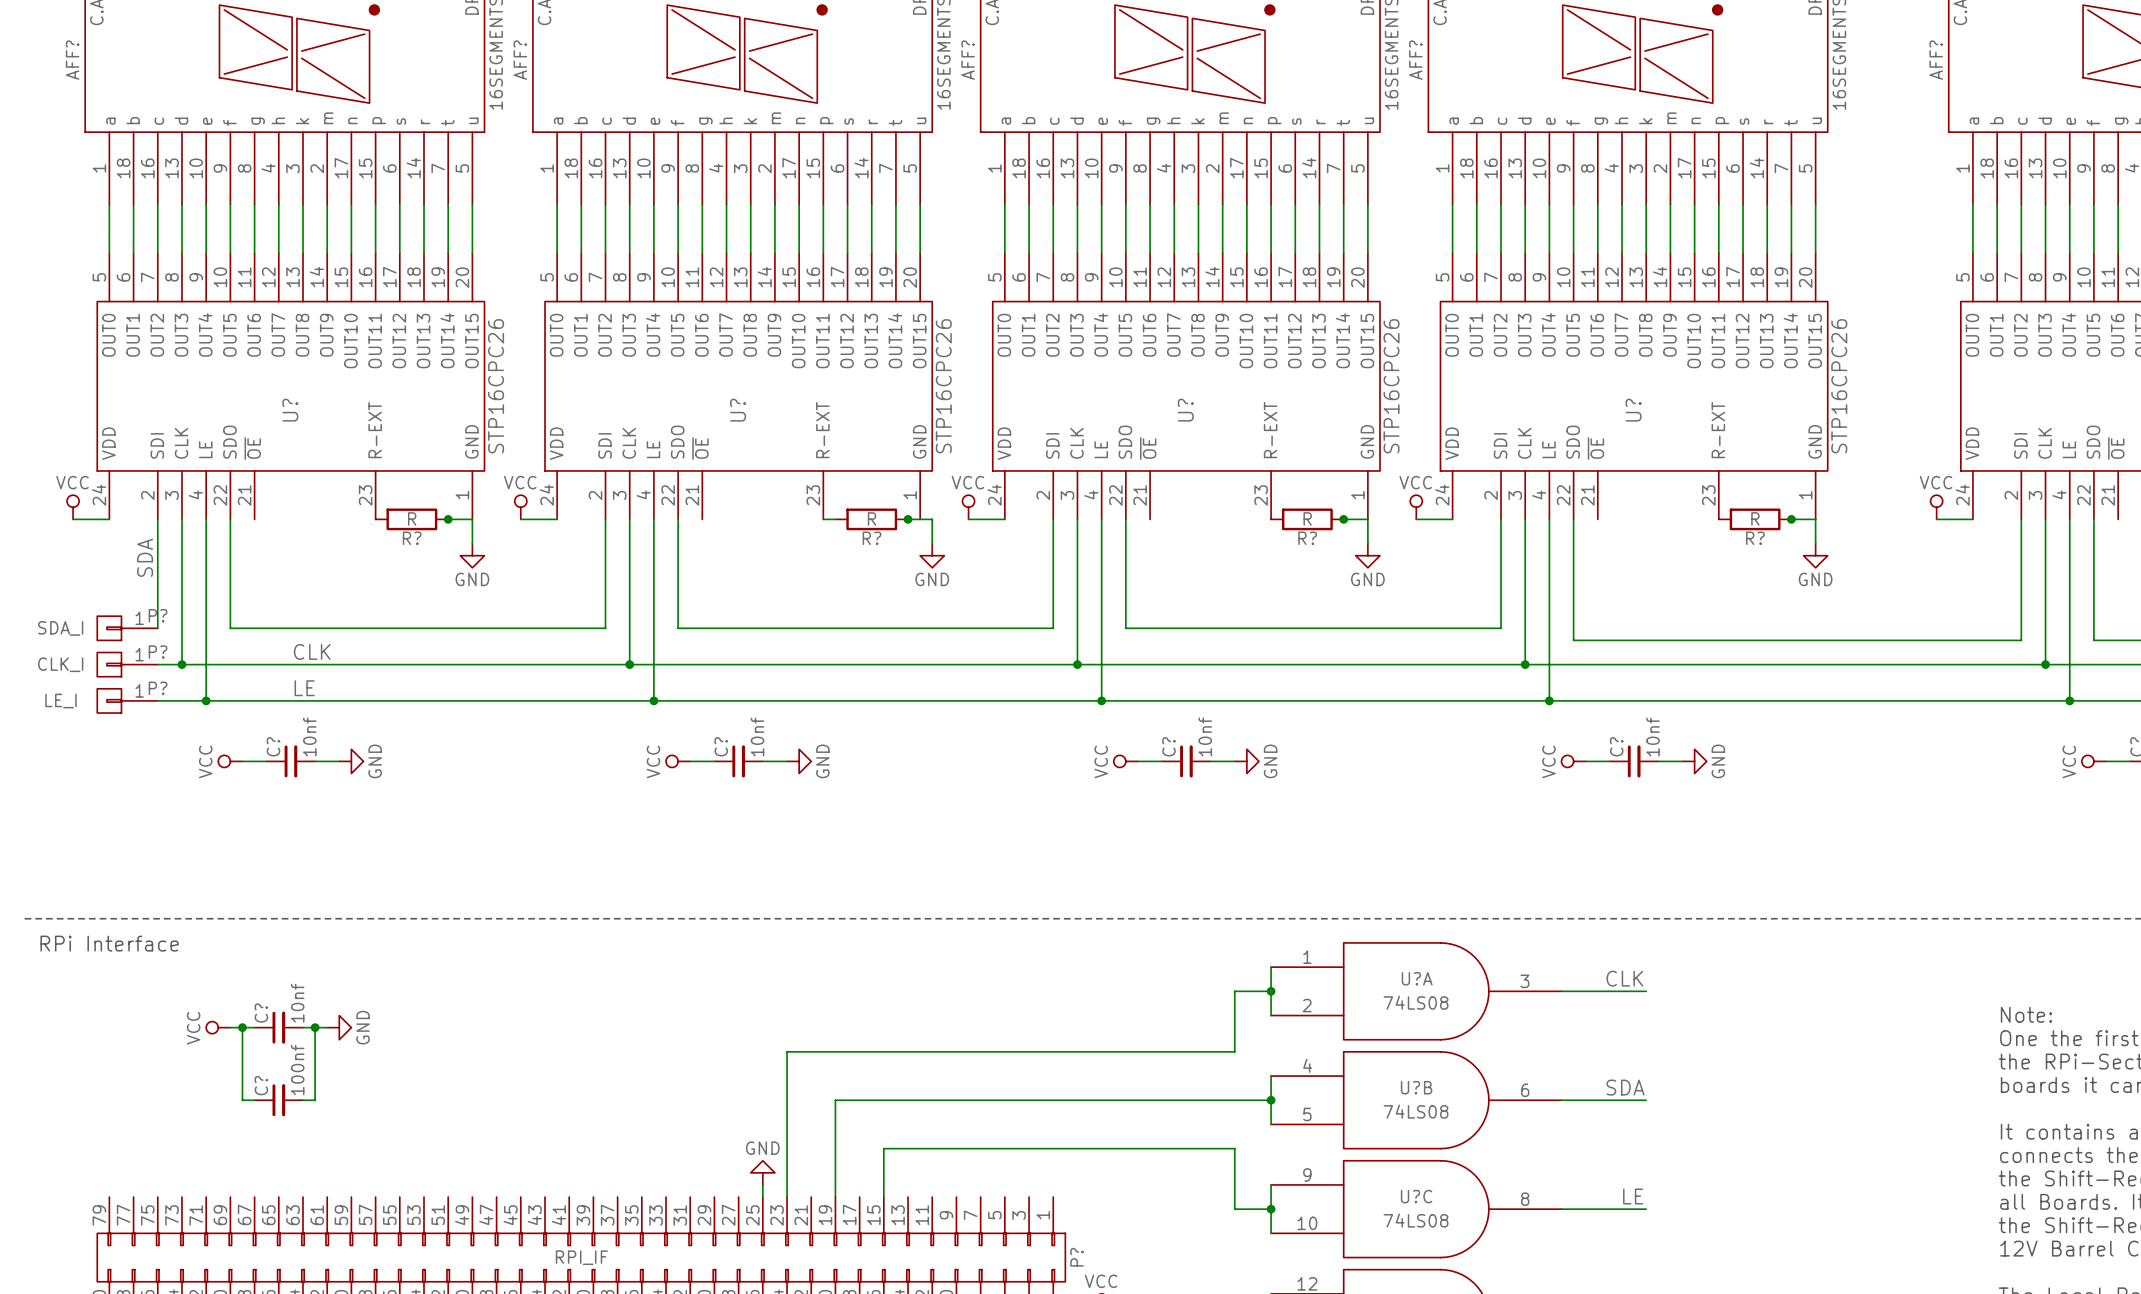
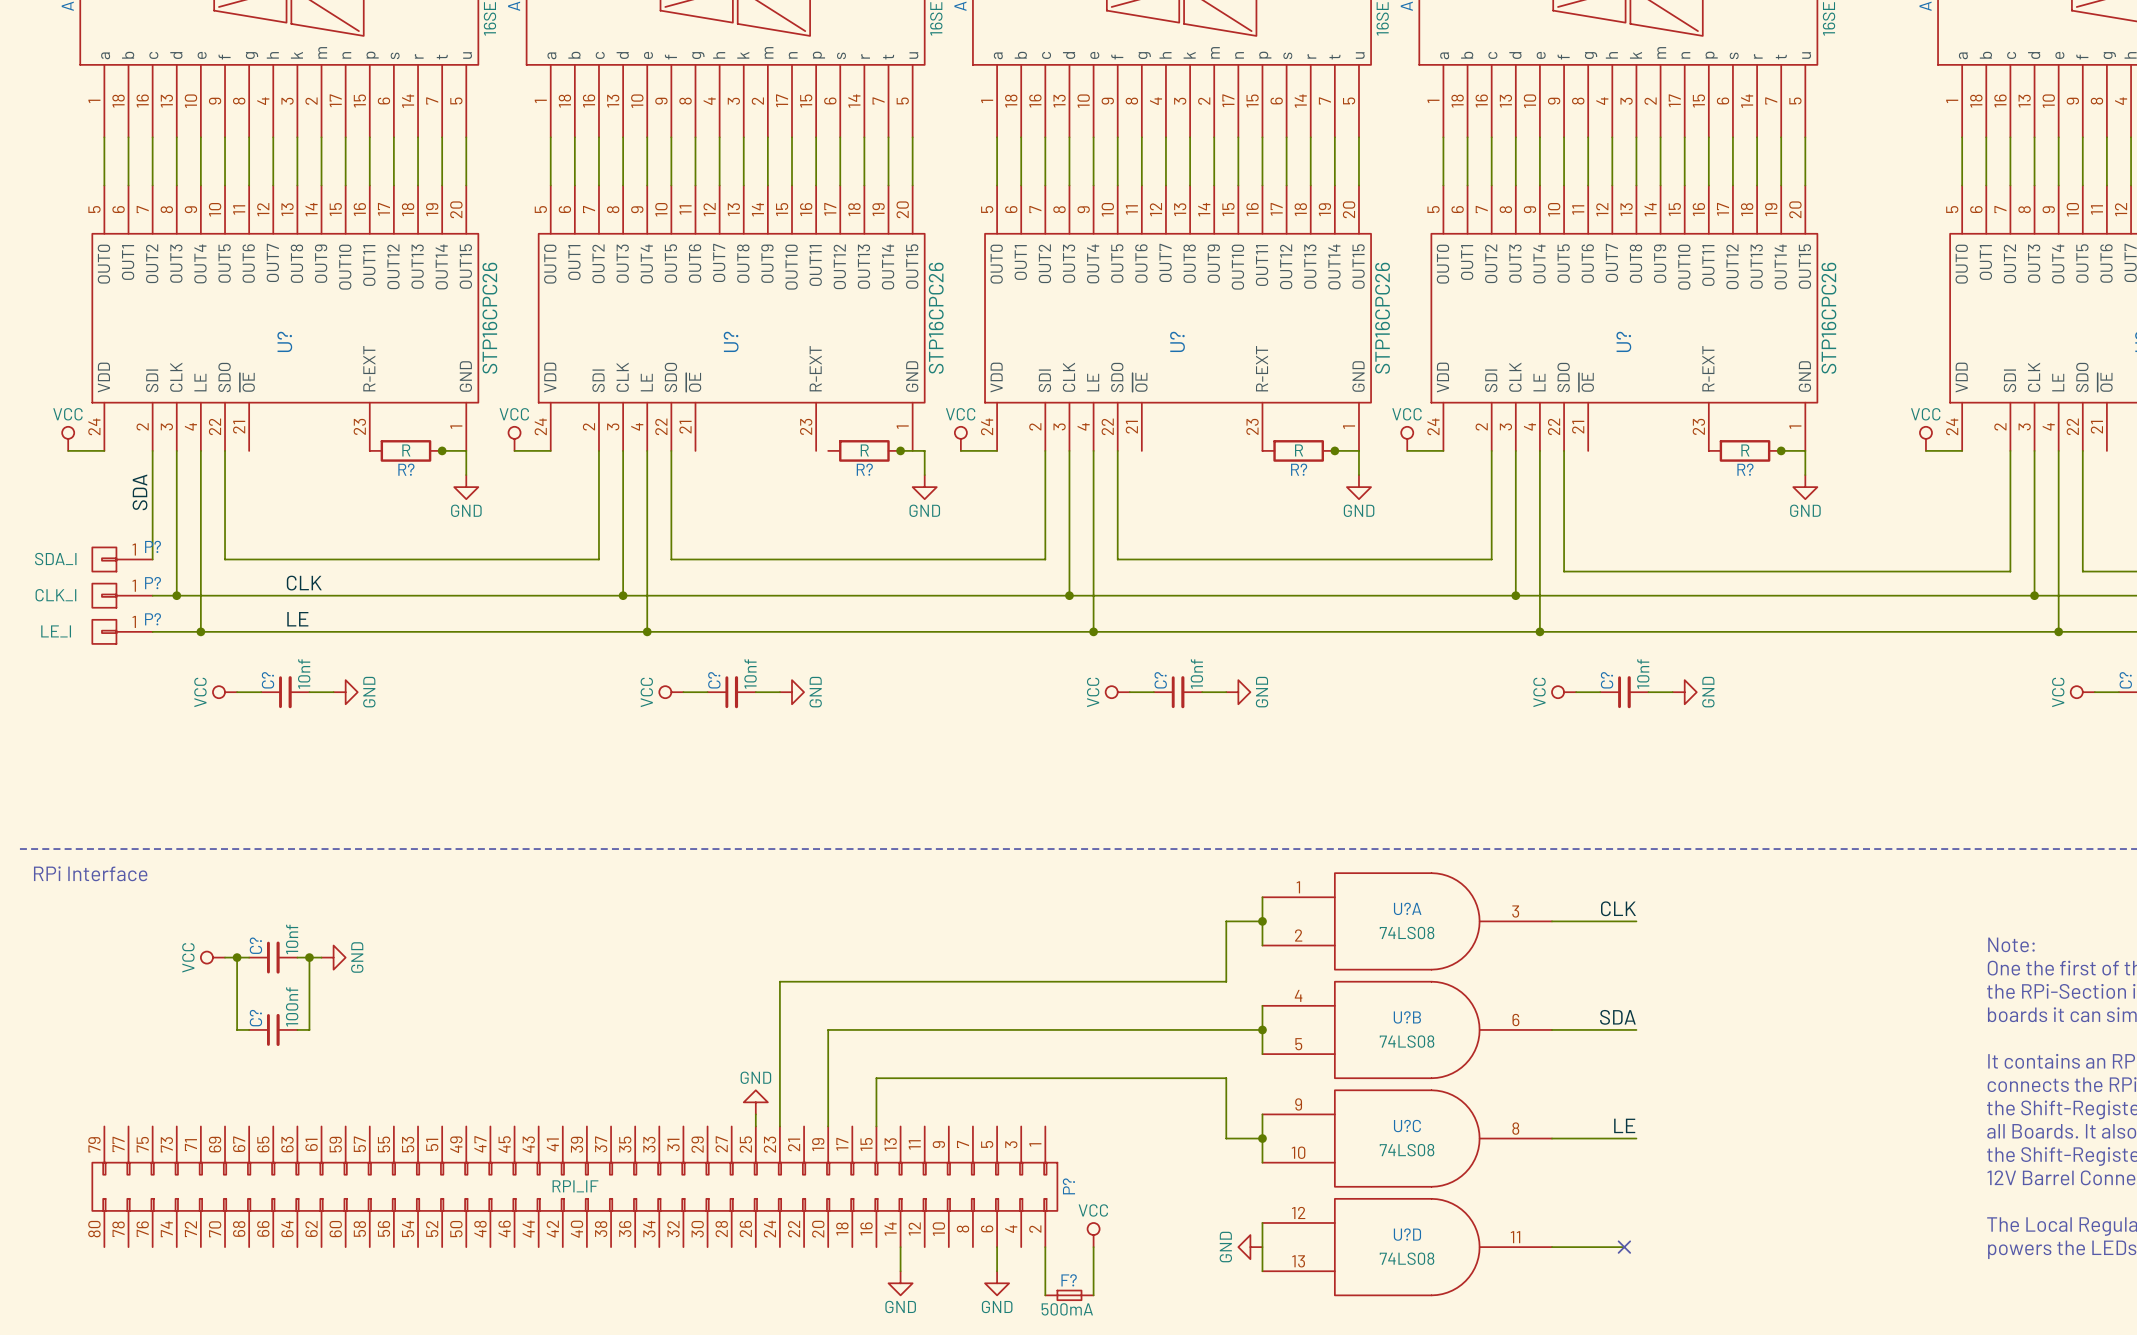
wire: (823, 519) (835, 519) -> none

